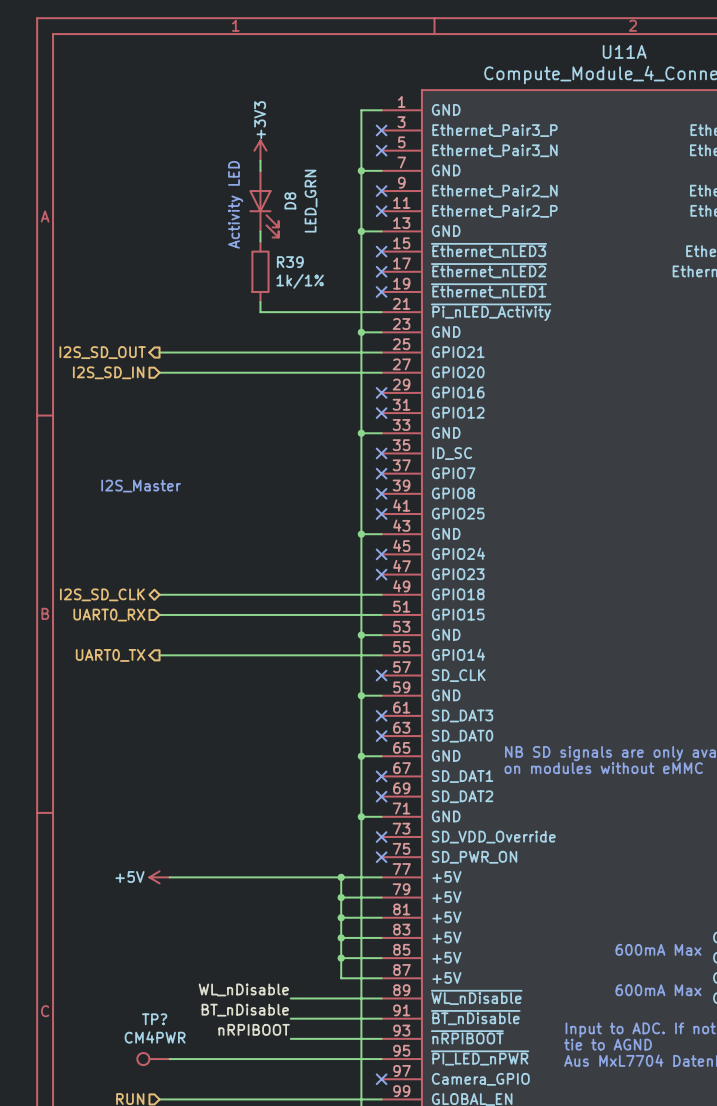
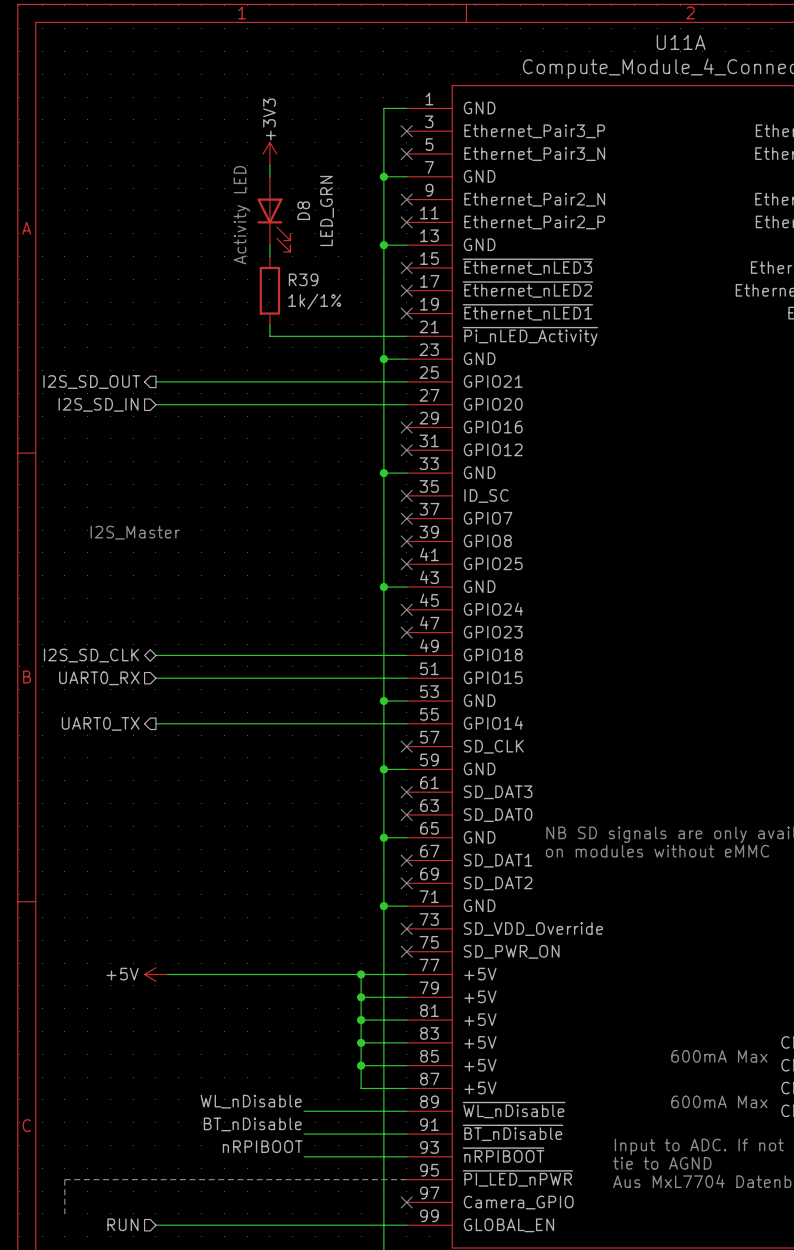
TP?: CM4PWR (153, 1059) -> none
line: none -> (406, 1179) (64, 1179) (64, 1213)

